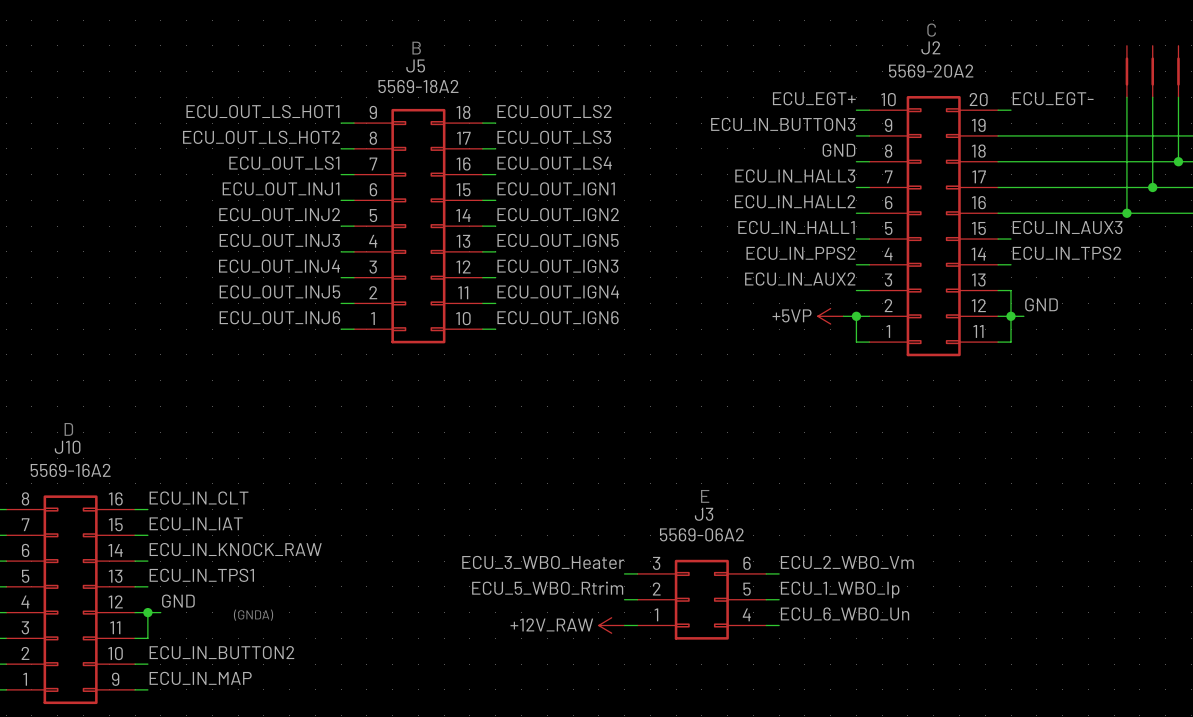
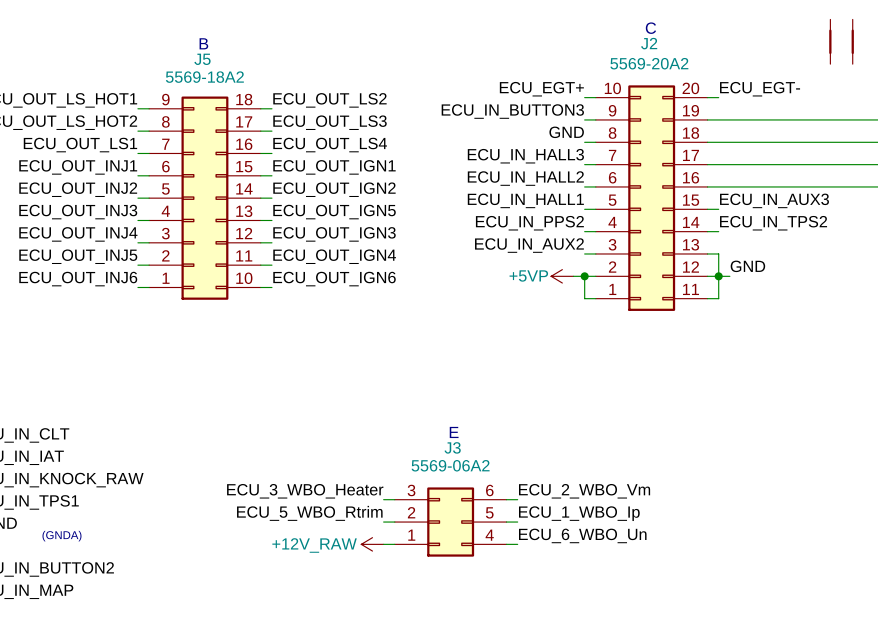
part: none -> (830, 41)
part: none -> (852, 41)
part: (1126, 71) -> none
part: (1152, 71) -> none
part: (1178, 71) -> none
wire: (1126, 97) (1126, 213) -> none
wire: (1152, 97) (1152, 187) -> none
wire: (1178, 97) (1178, 161) -> none
junction: (1178, 161) -> none
junction: (1152, 187) -> none
junction: (1126, 213) -> none

